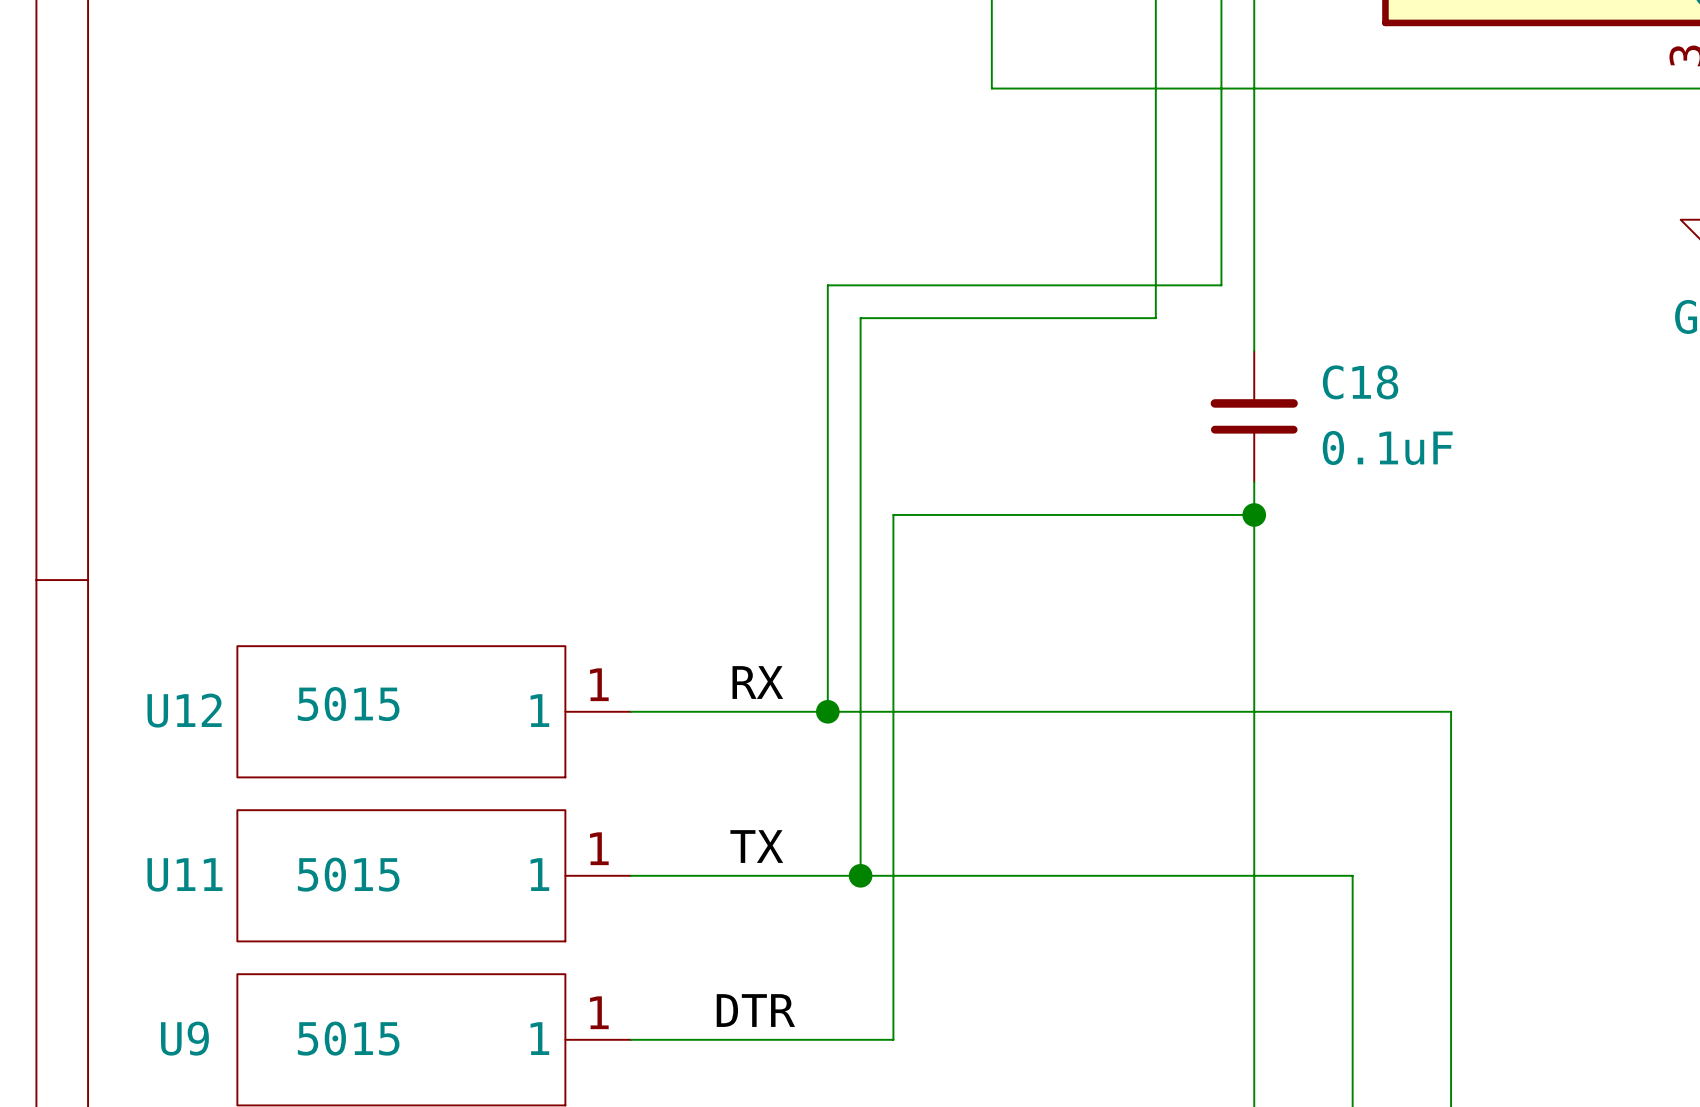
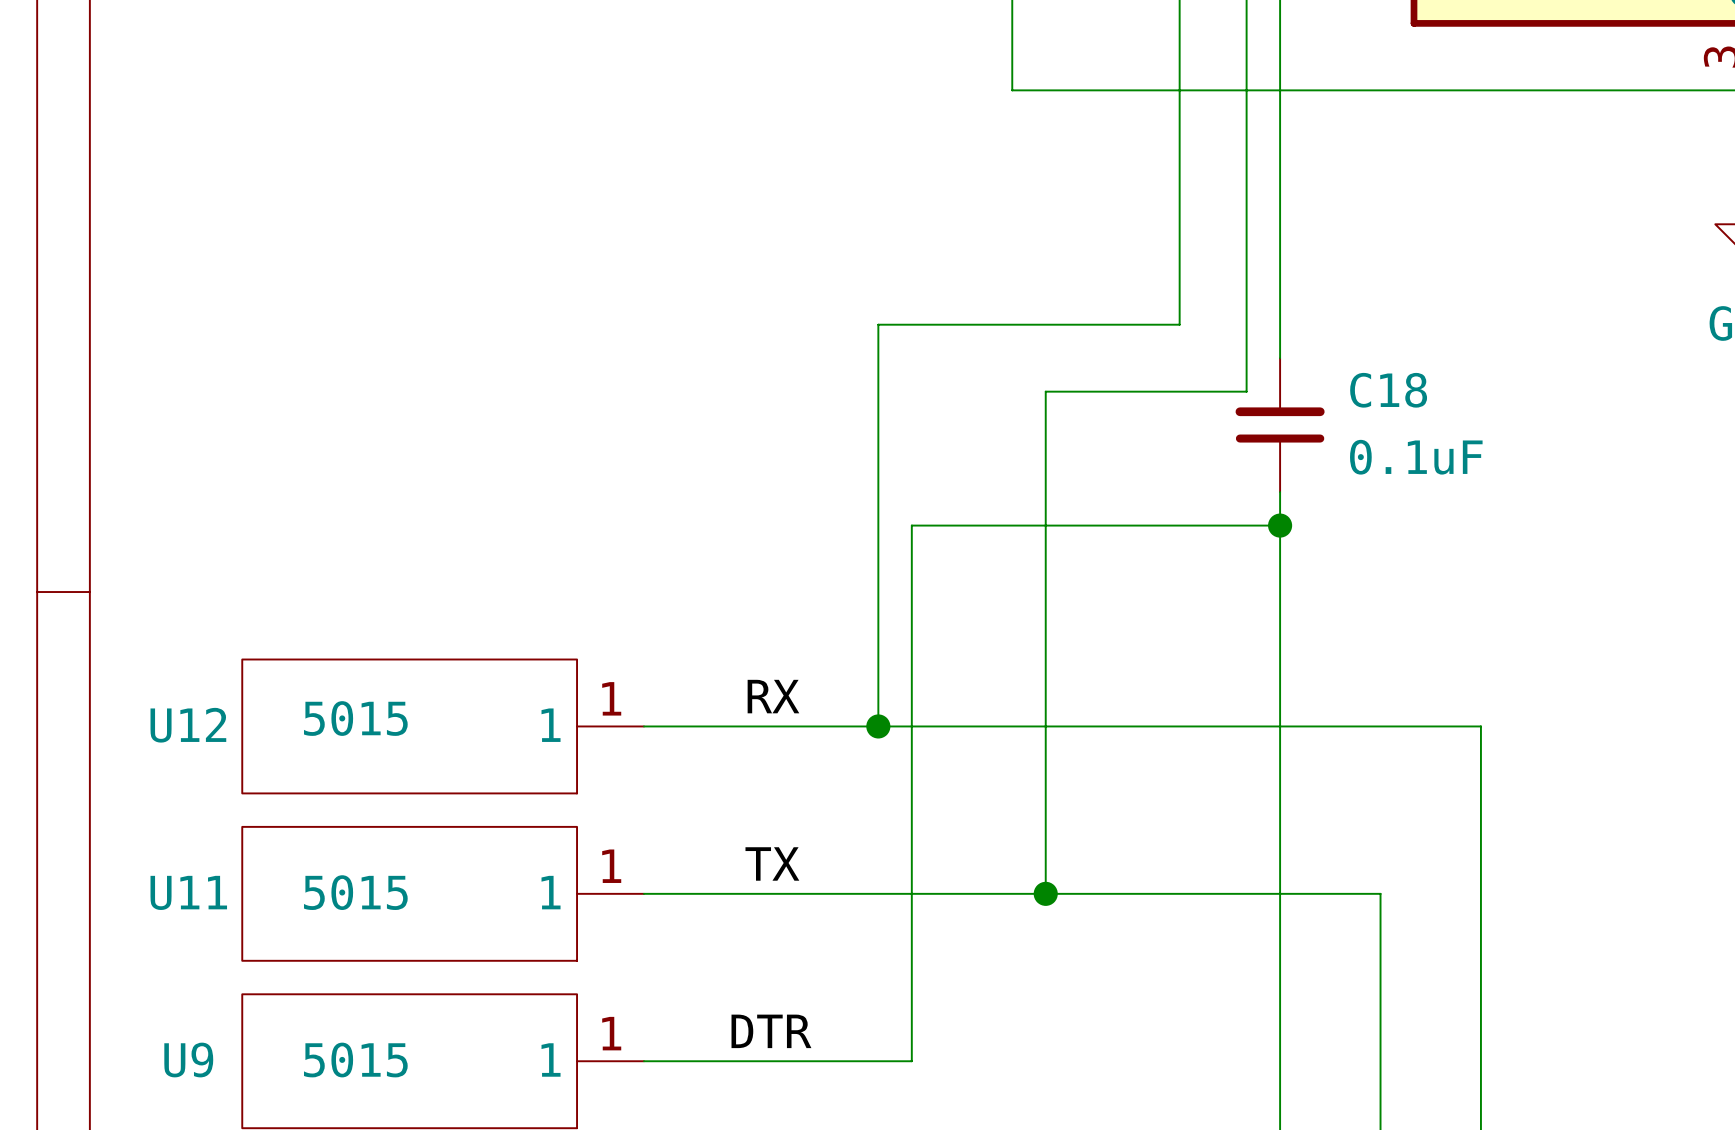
wire: (1221, 285) (827, 285) (827, 711) -> (1246, 291) (1246, 391) (1045, 391) (1045, 893)
junction position: (827, 711) -> (878, 726)
wire: (860, 711) (860, 875) -> none
junction: (860, 875) -> none
junction: none -> (1045, 893)

